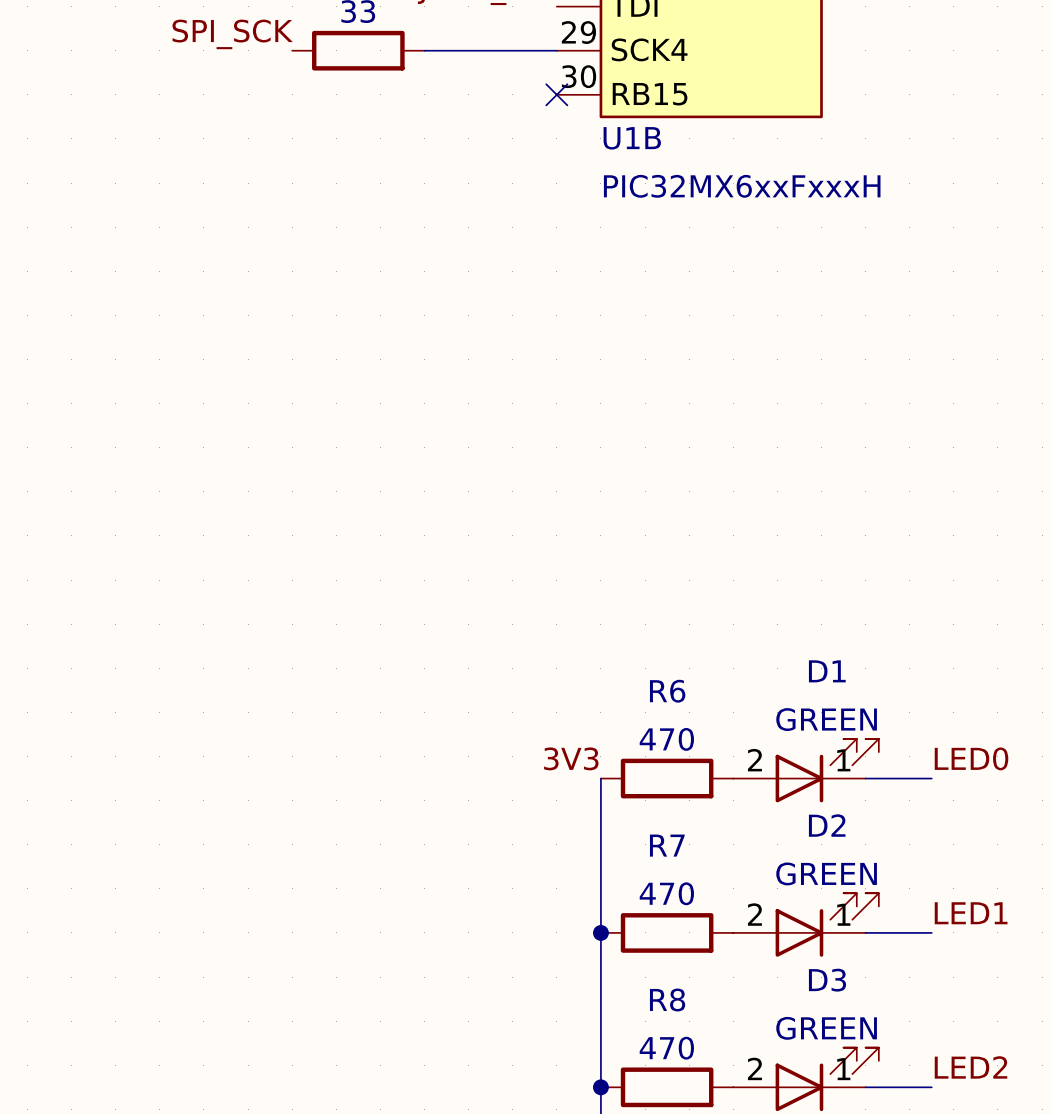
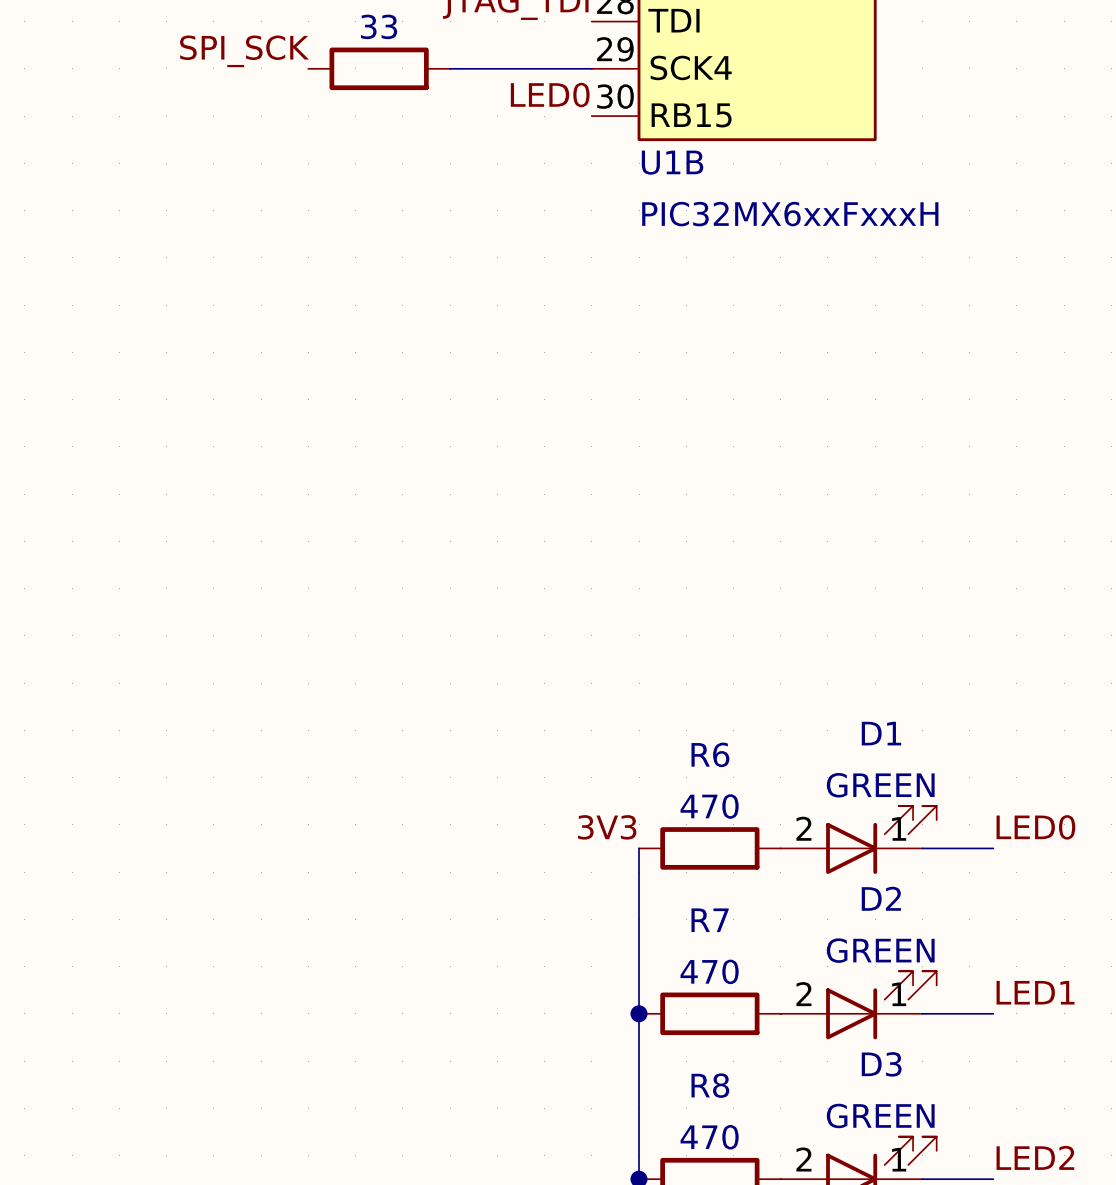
label: none -> LED0 (550, 95)
no-connect mark: (556, 94) -> none

